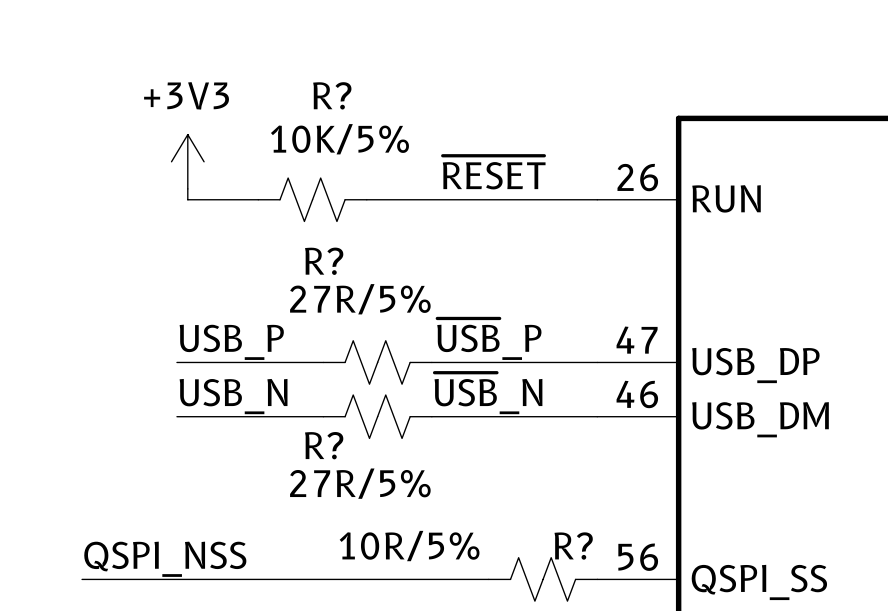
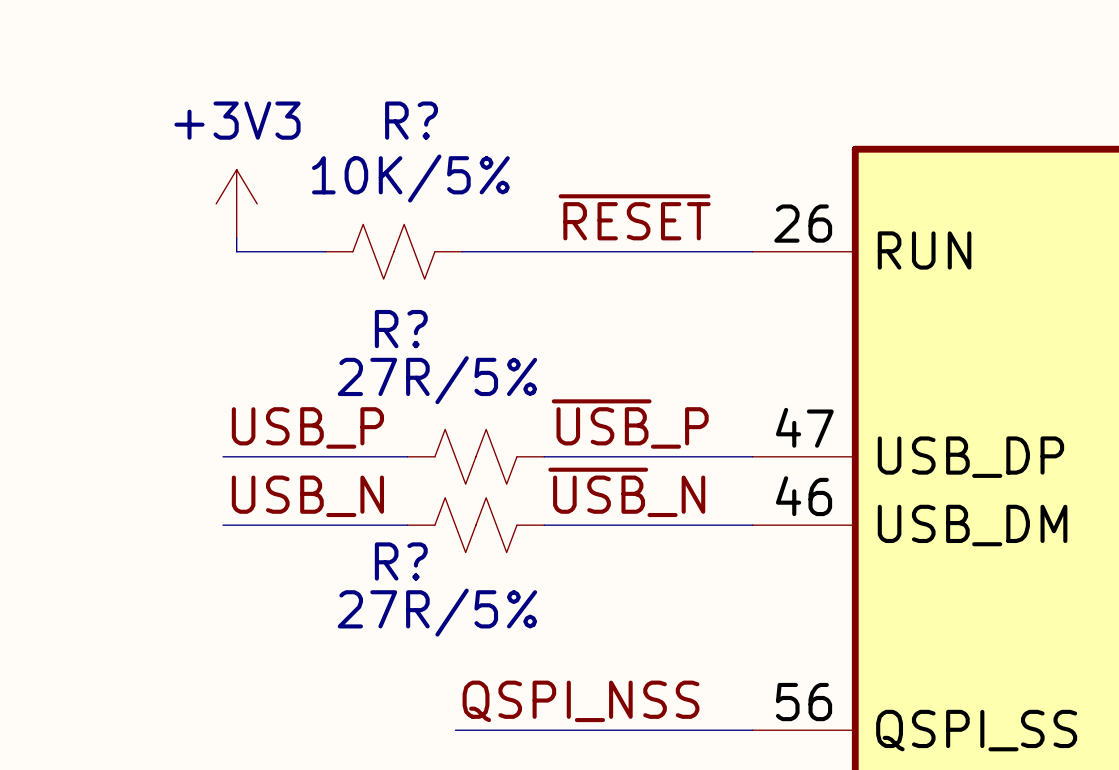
label position: QSPI_NSS (165, 559) -> QSPI_NSS (580, 701)
wire: (82, 579) (361, 579) -> none
wire: none -> (616, 730) (752, 730)
R?: 10R/5% (543, 579) -> none

